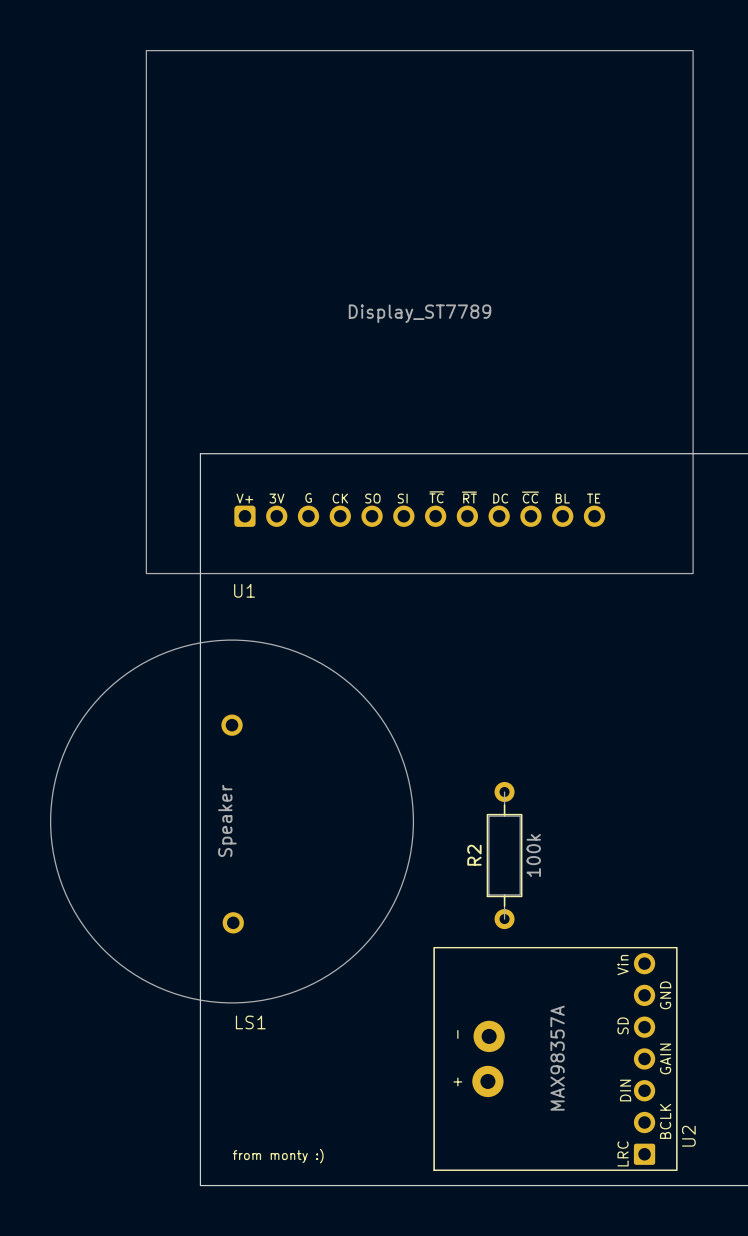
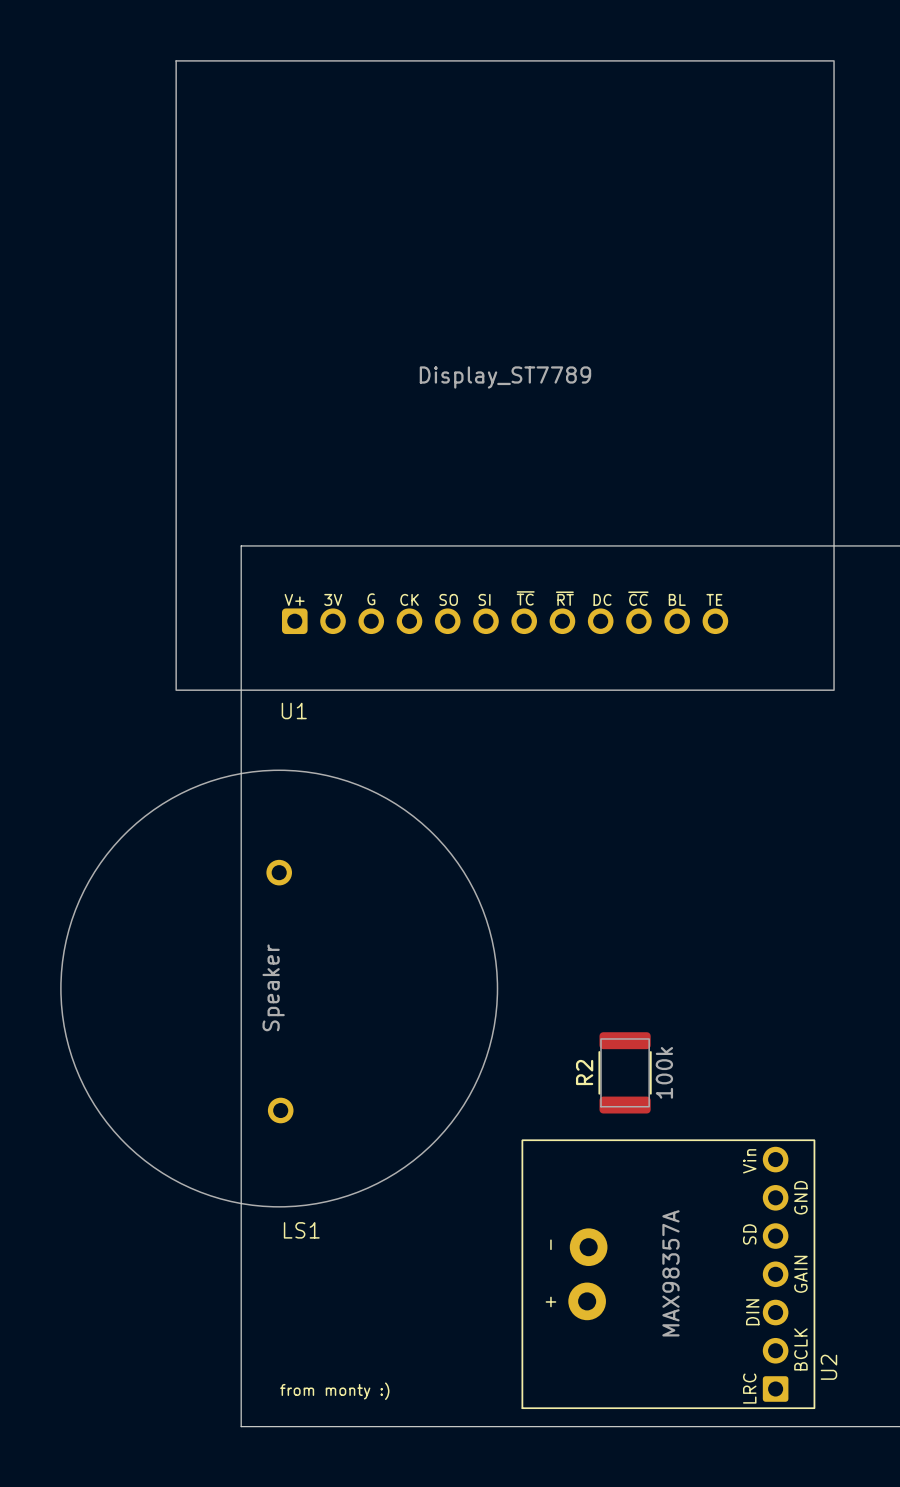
R2 footprint: [486, 781, 523, 930] -> [598, 1032, 652, 1114]

